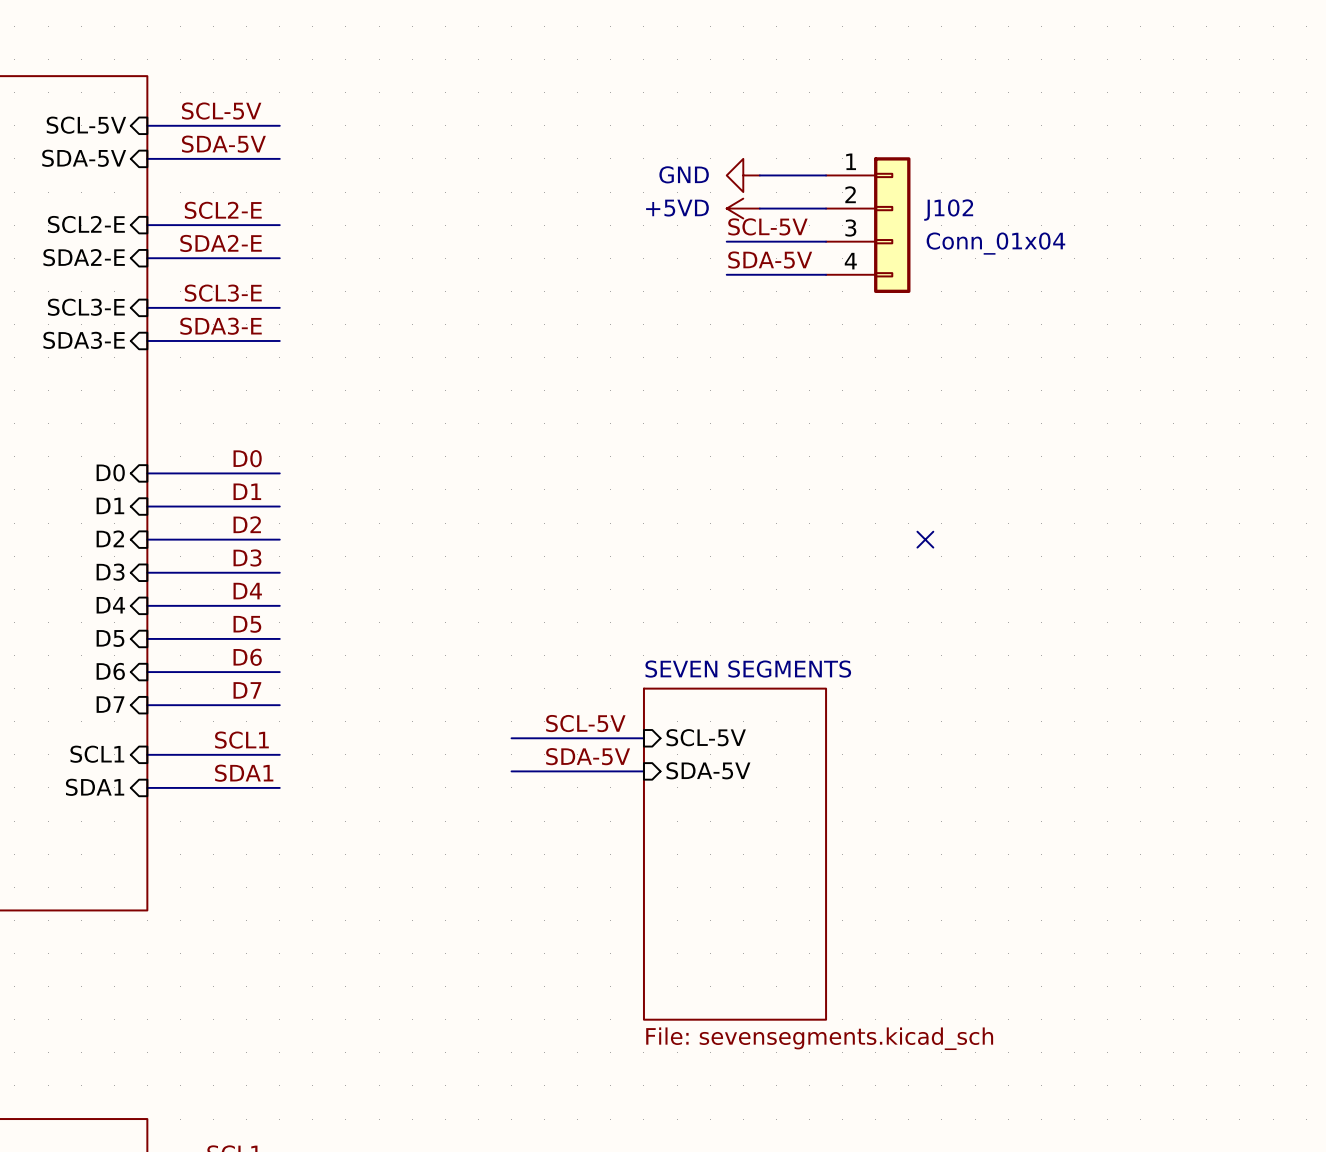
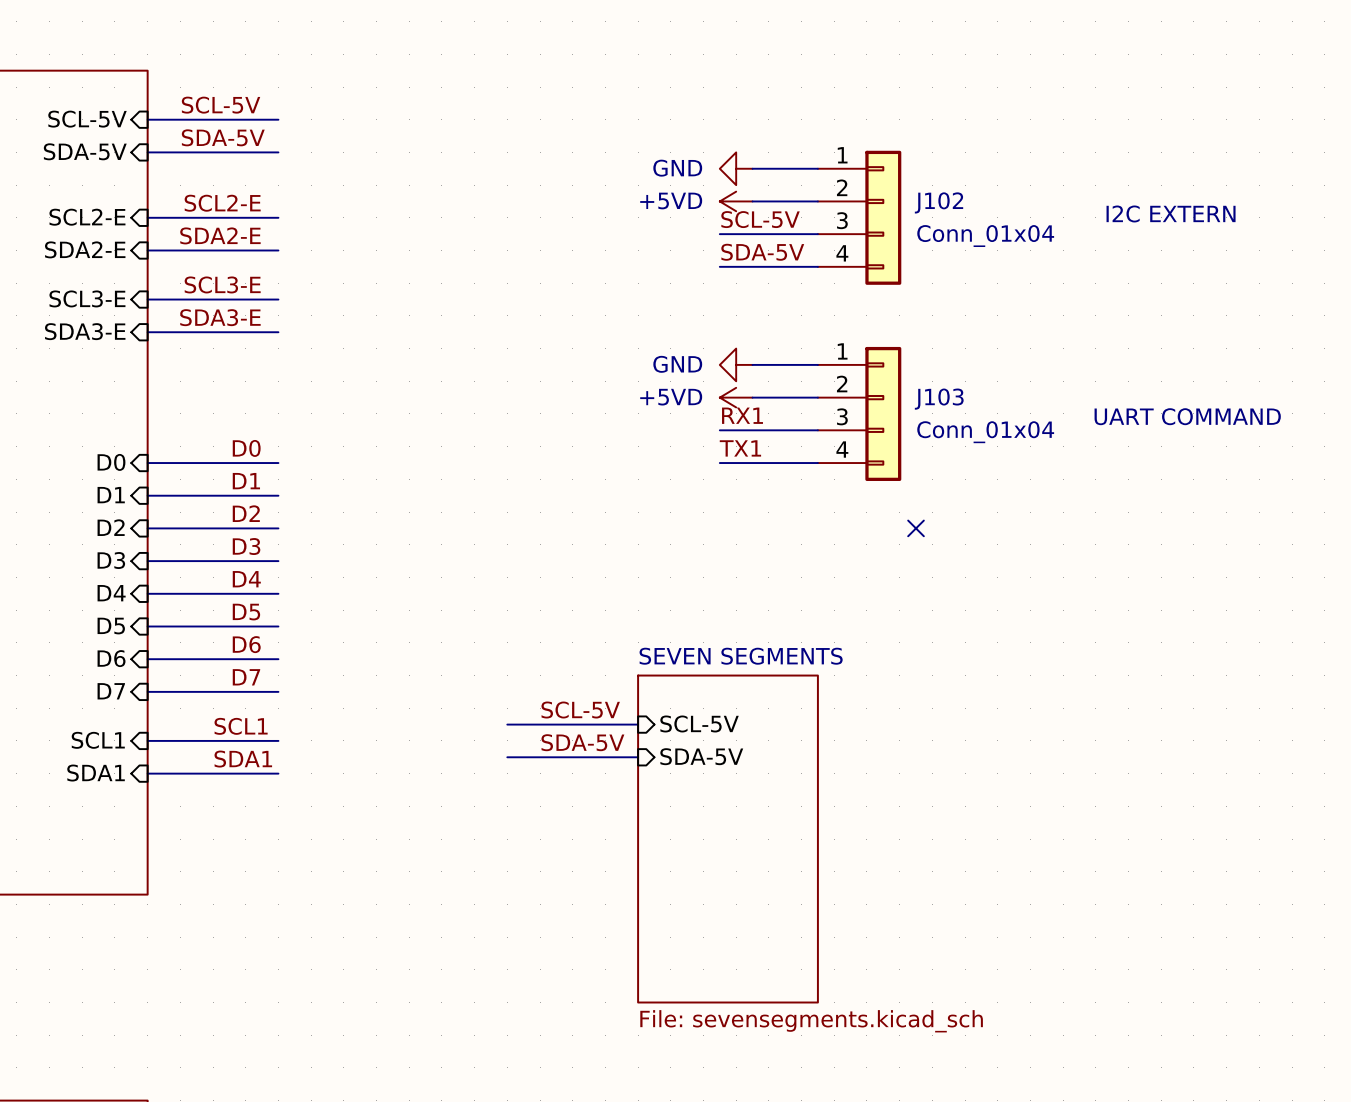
text: none -> I2C EXTERN (1171, 213)
power symbol: none -> GND (736, 364)
wire: none -> (752, 364) (817, 364)
power symbol: none -> +5VD (736, 397)
wire: none -> (752, 397) (817, 397)
J103: none -> Conn_01x04 (859, 413)
label: none -> RX1 (742, 415)
text: none -> UART COMMAND (1187, 416)
wire: none -> (719, 430) (817, 430)
label: none -> TX1 (740, 448)
wire: none -> (719, 463) (817, 463)

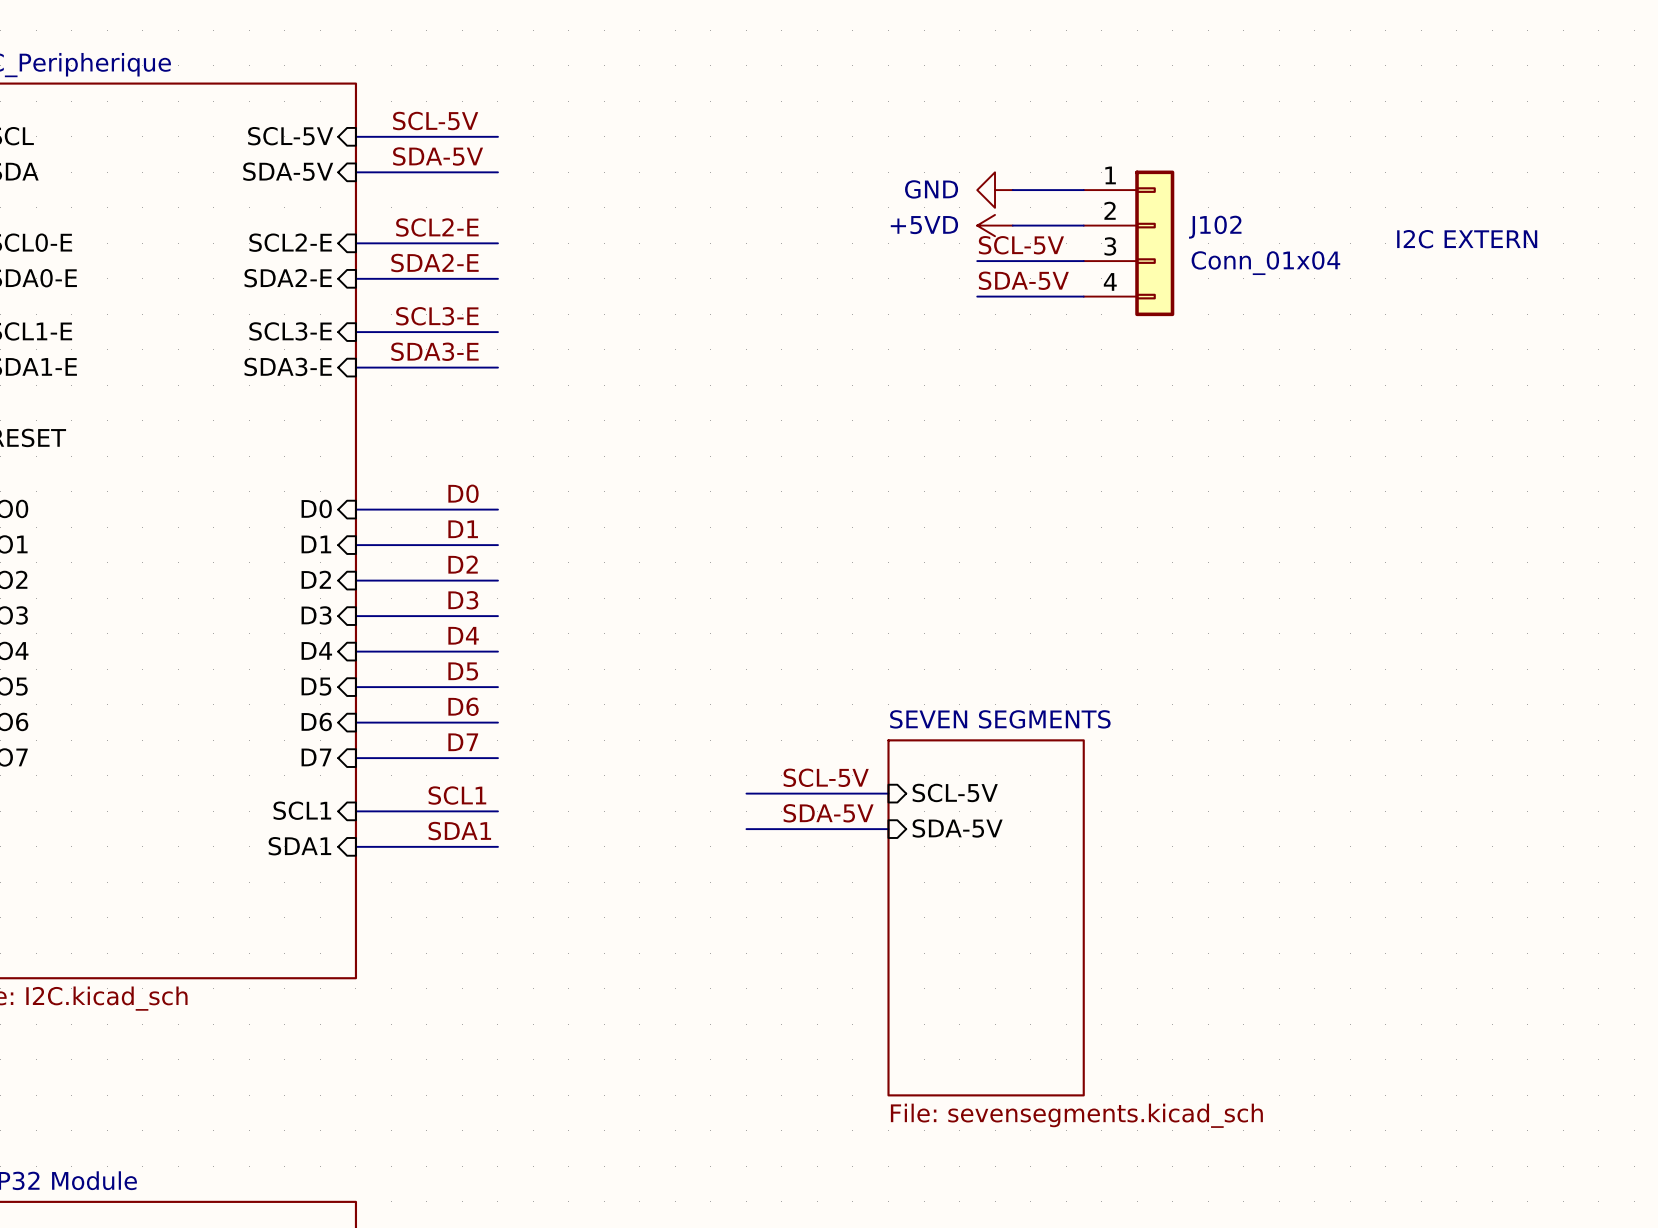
power symbol: GND (736, 364) -> none
wire: (752, 364) (817, 364) -> none
power symbol: +5VD (736, 397) -> none
wire: (752, 397) (817, 397) -> none
J103: Conn_01x04 (859, 413) -> none
label: RX1 (742, 415) -> none
text: UART COMMAND (1187, 416) -> none
wire: (719, 430) (817, 430) -> none
label: TX1 (740, 448) -> none
wire: (719, 463) (817, 463) -> none
no-connect mark: (916, 528) -> none

